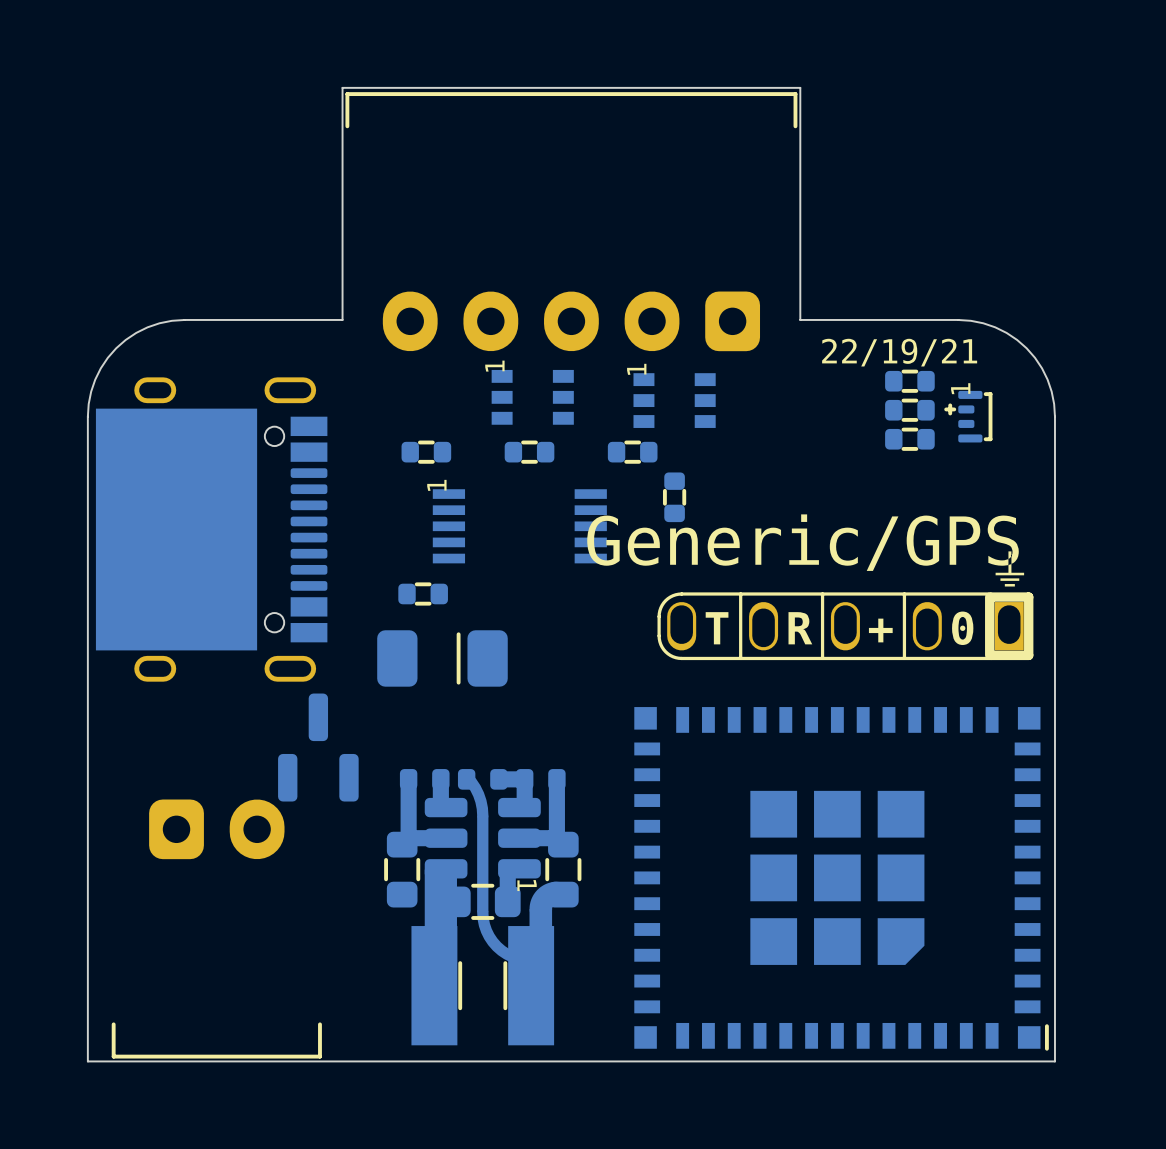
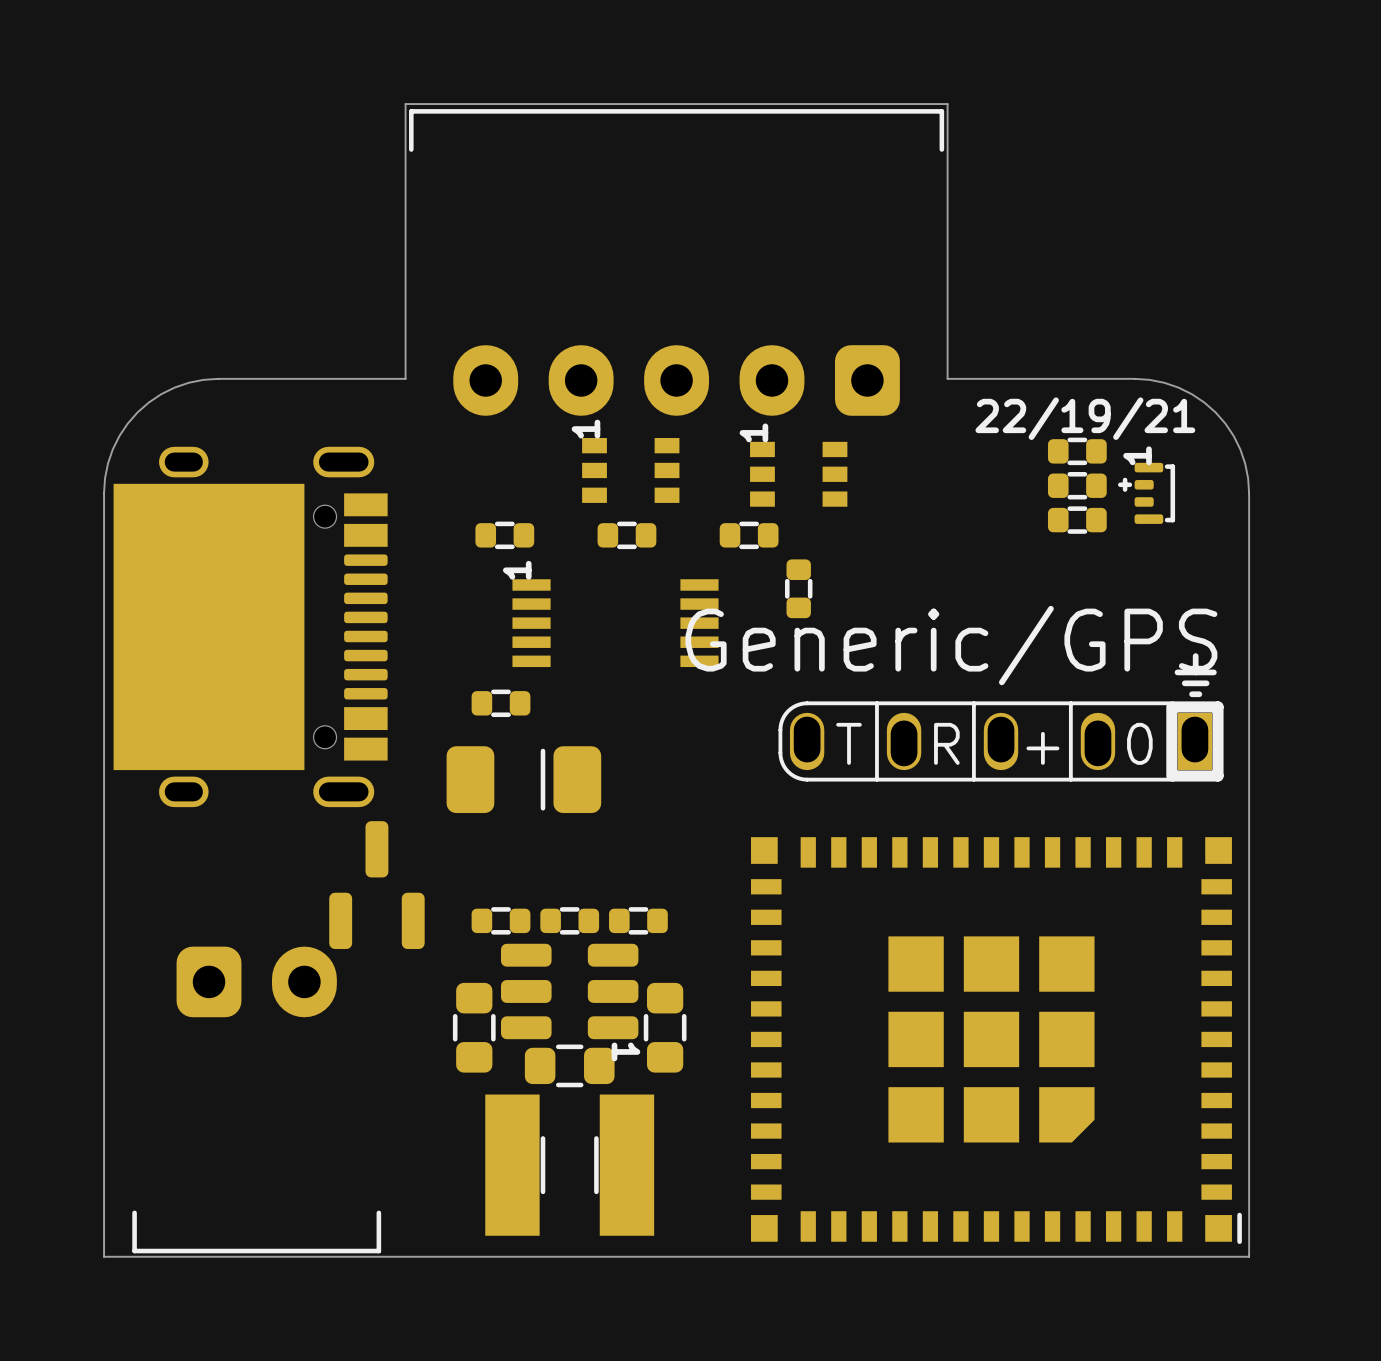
part footprint: [386, 769, 579, 1046] -> [524, 1044, 615, 1088]
part: none -> (501, 920)
part: none -> (569, 920)
part: none -> (638, 920)
part: none -> (569, 991)
drawing: [384, 858, 421, 882] -> none
drawing: [545, 858, 582, 882] -> none
part: none -> (474, 1027)
part: none -> (665, 1027)
drawing: [471, 883, 495, 920] -> none
drawing: [458, 961, 508, 1011] -> none
part: none -> (569, 1165)

